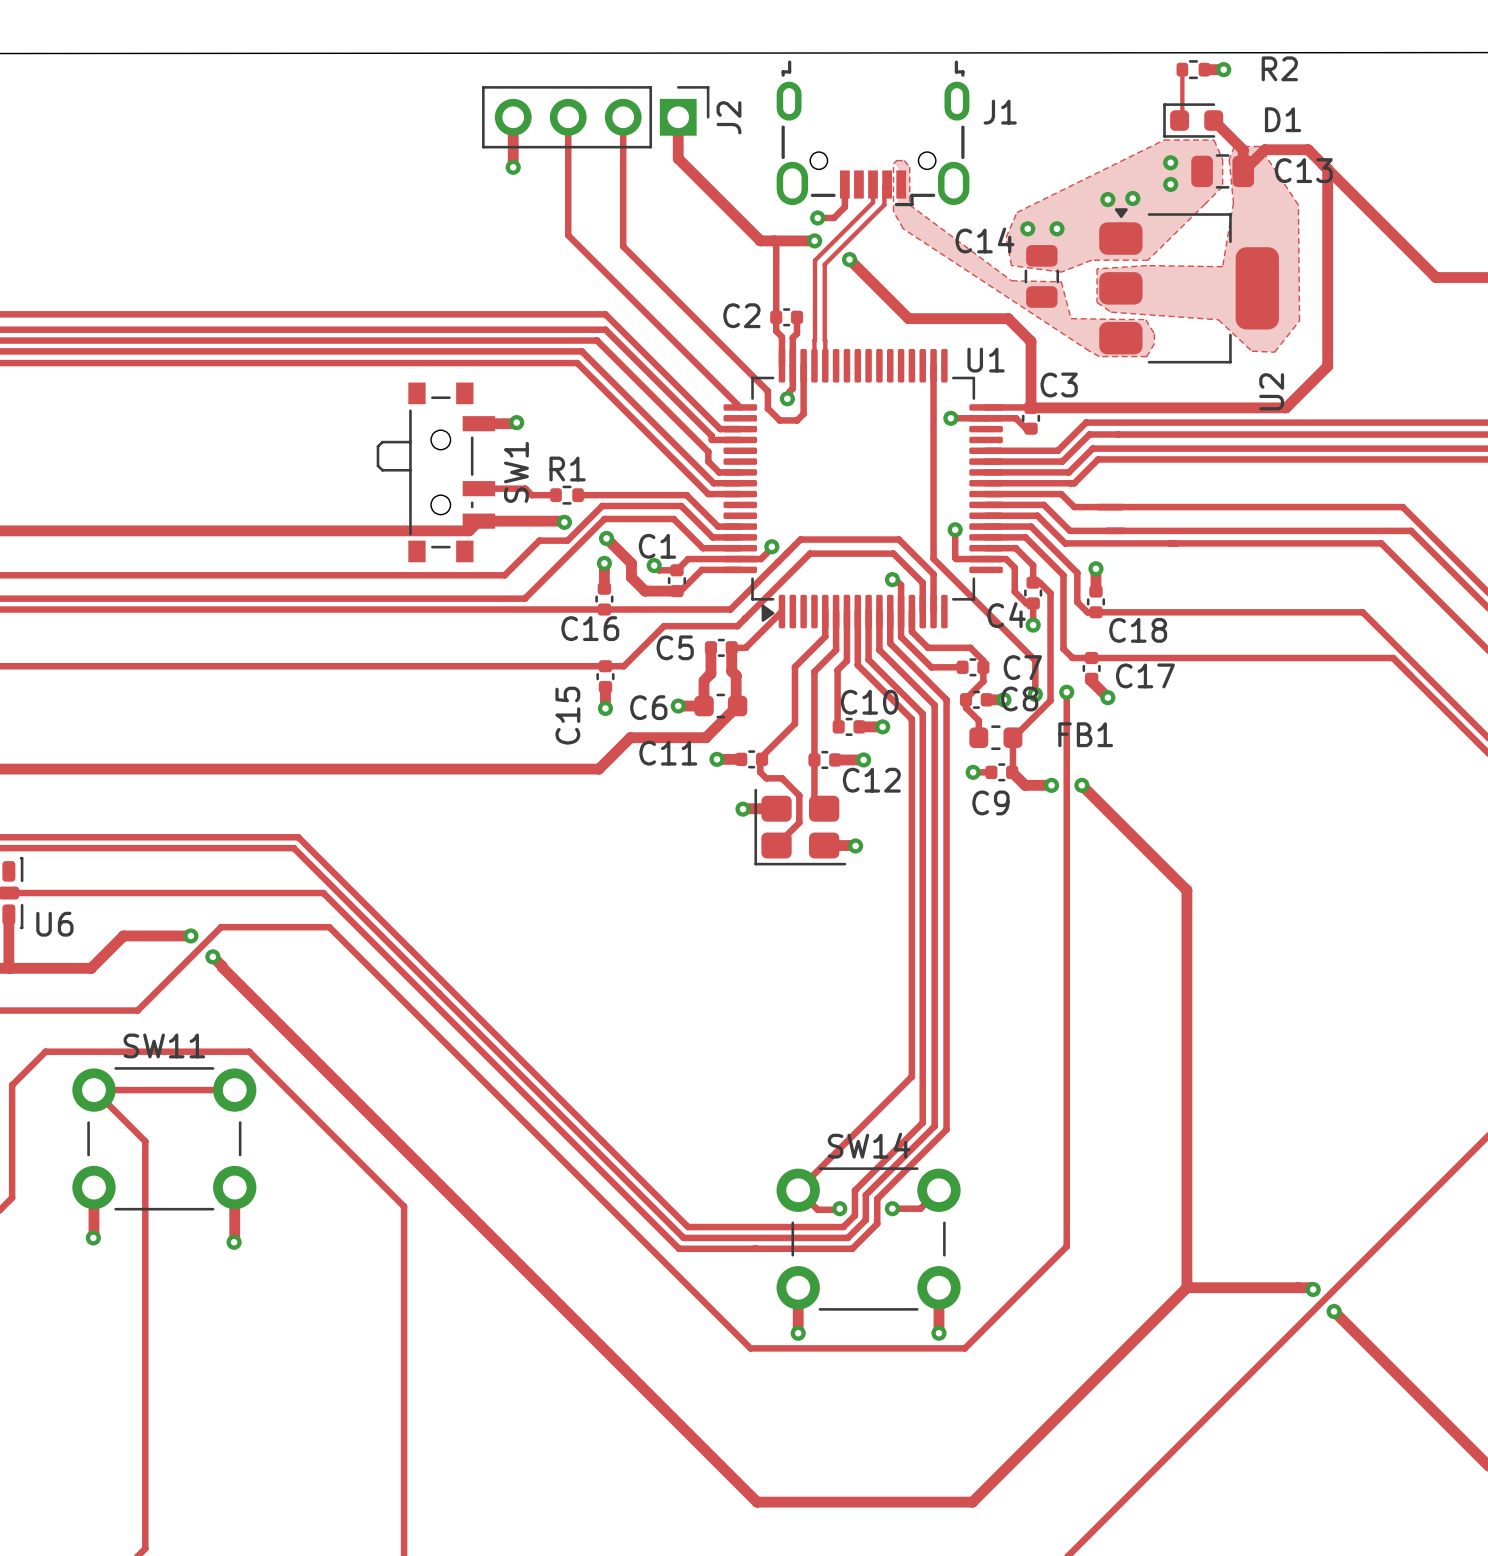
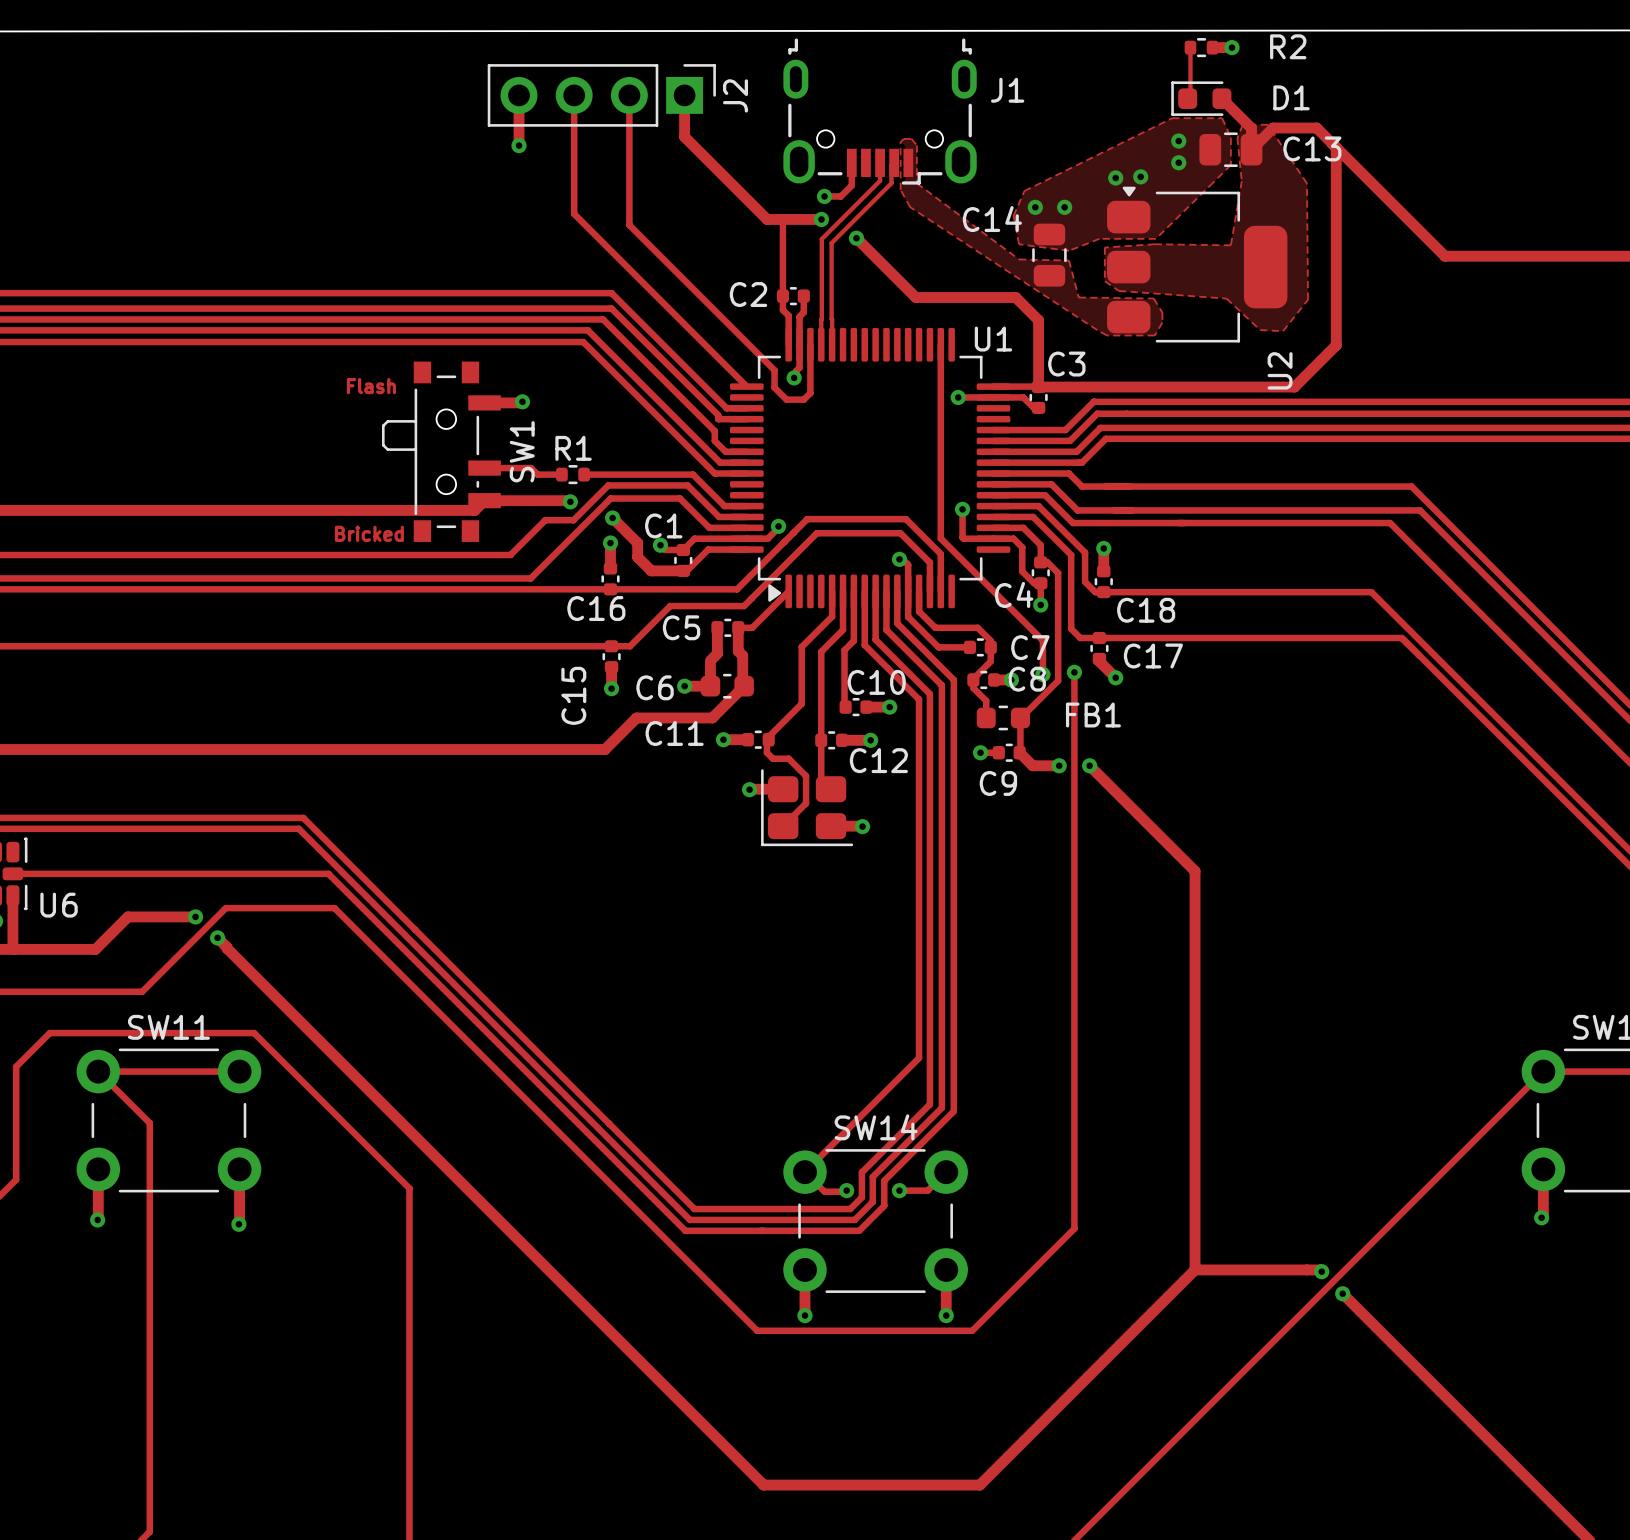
text: none -> Flash (371, 386)
text: none -> Bricked (369, 533)

